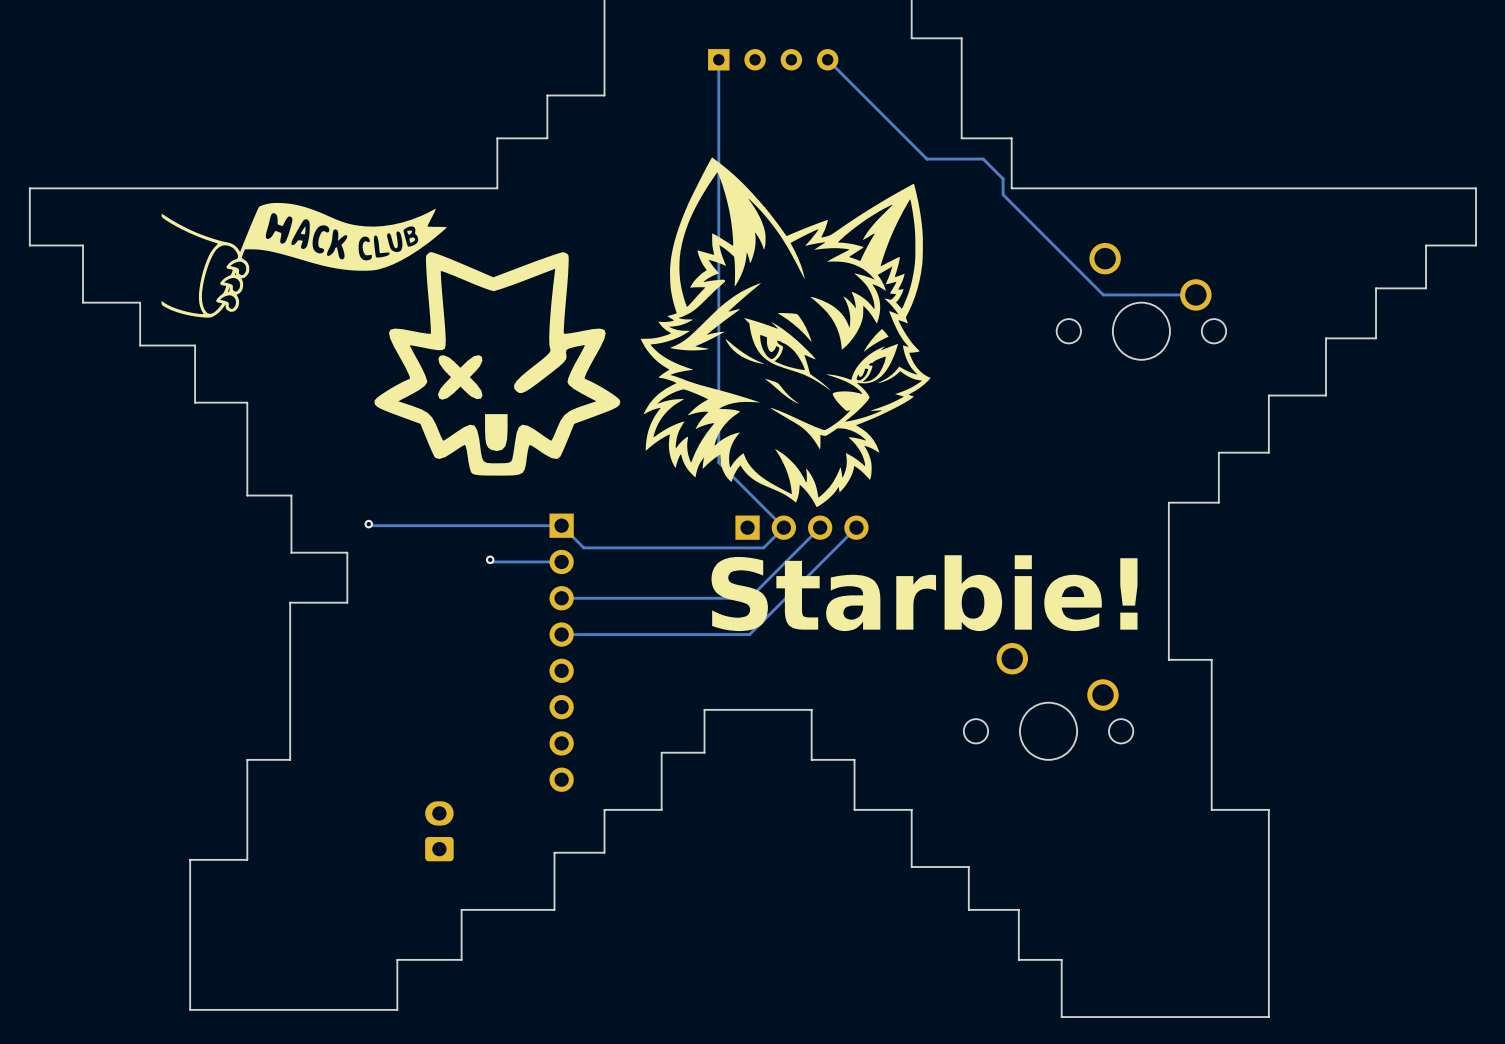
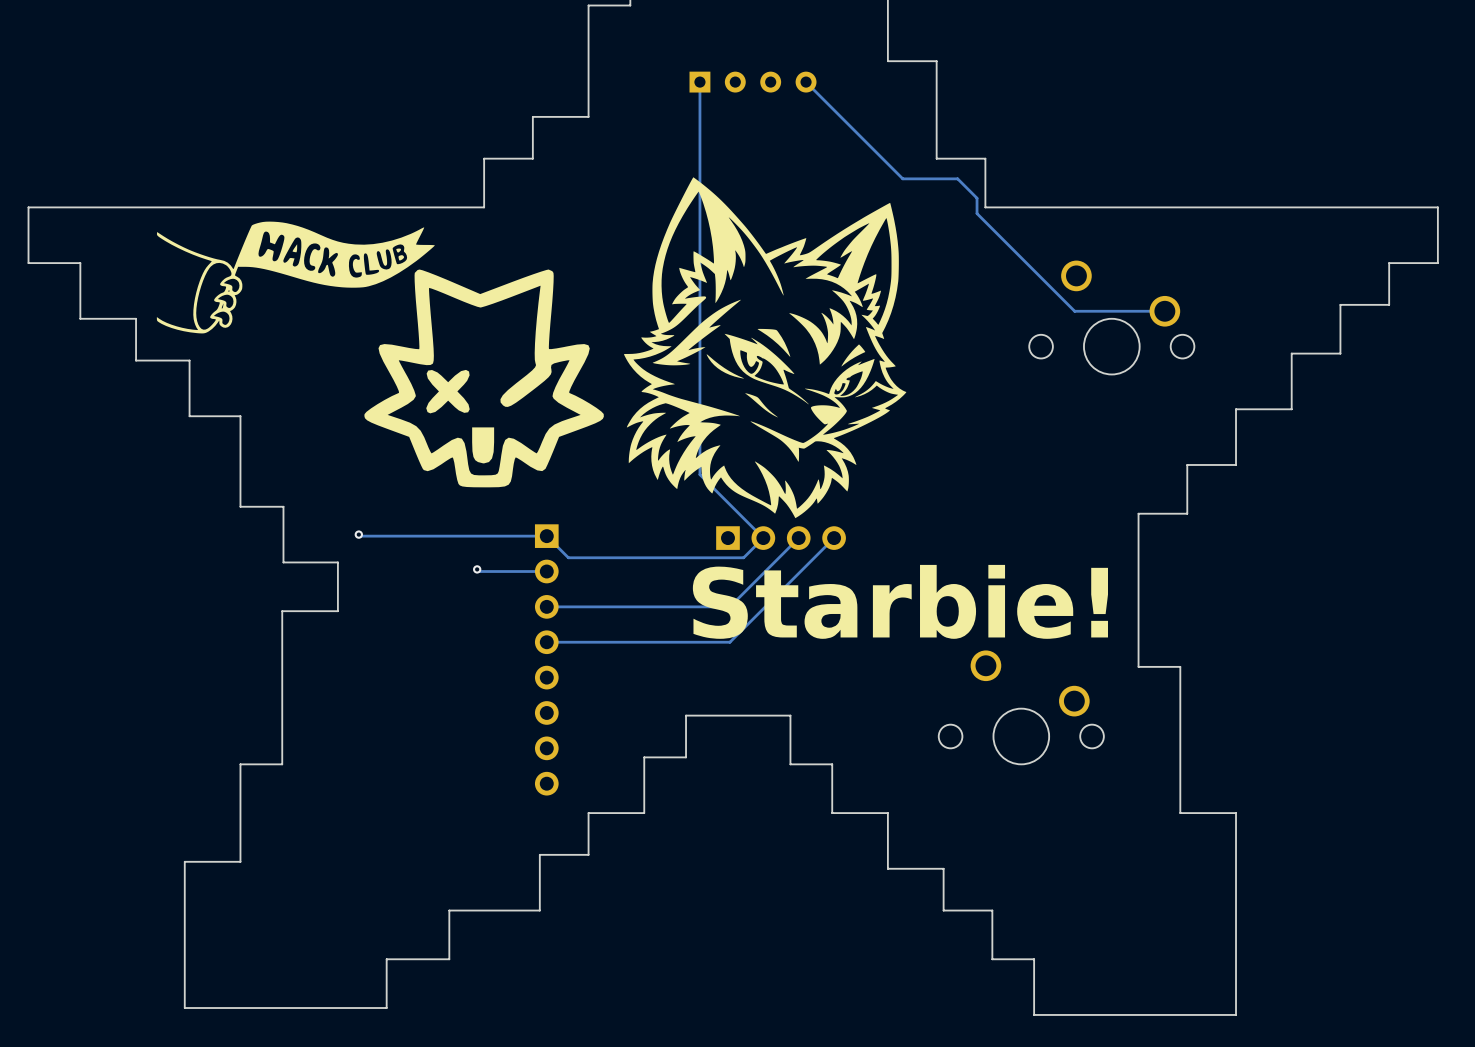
part: (439, 831) -> none

